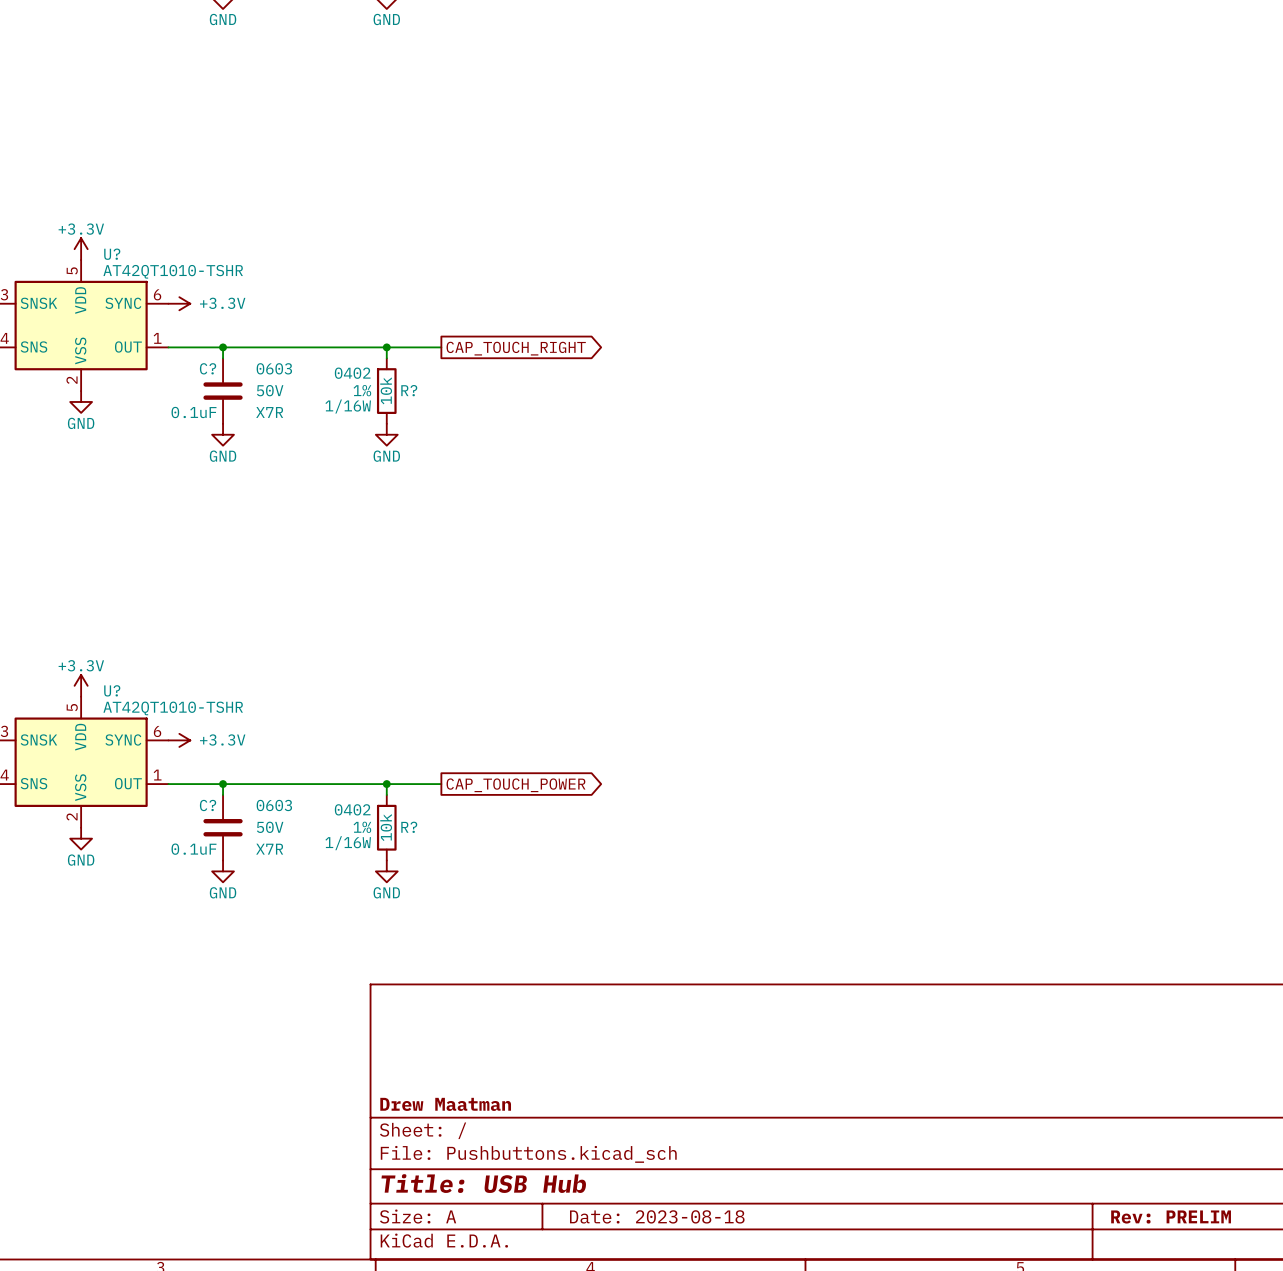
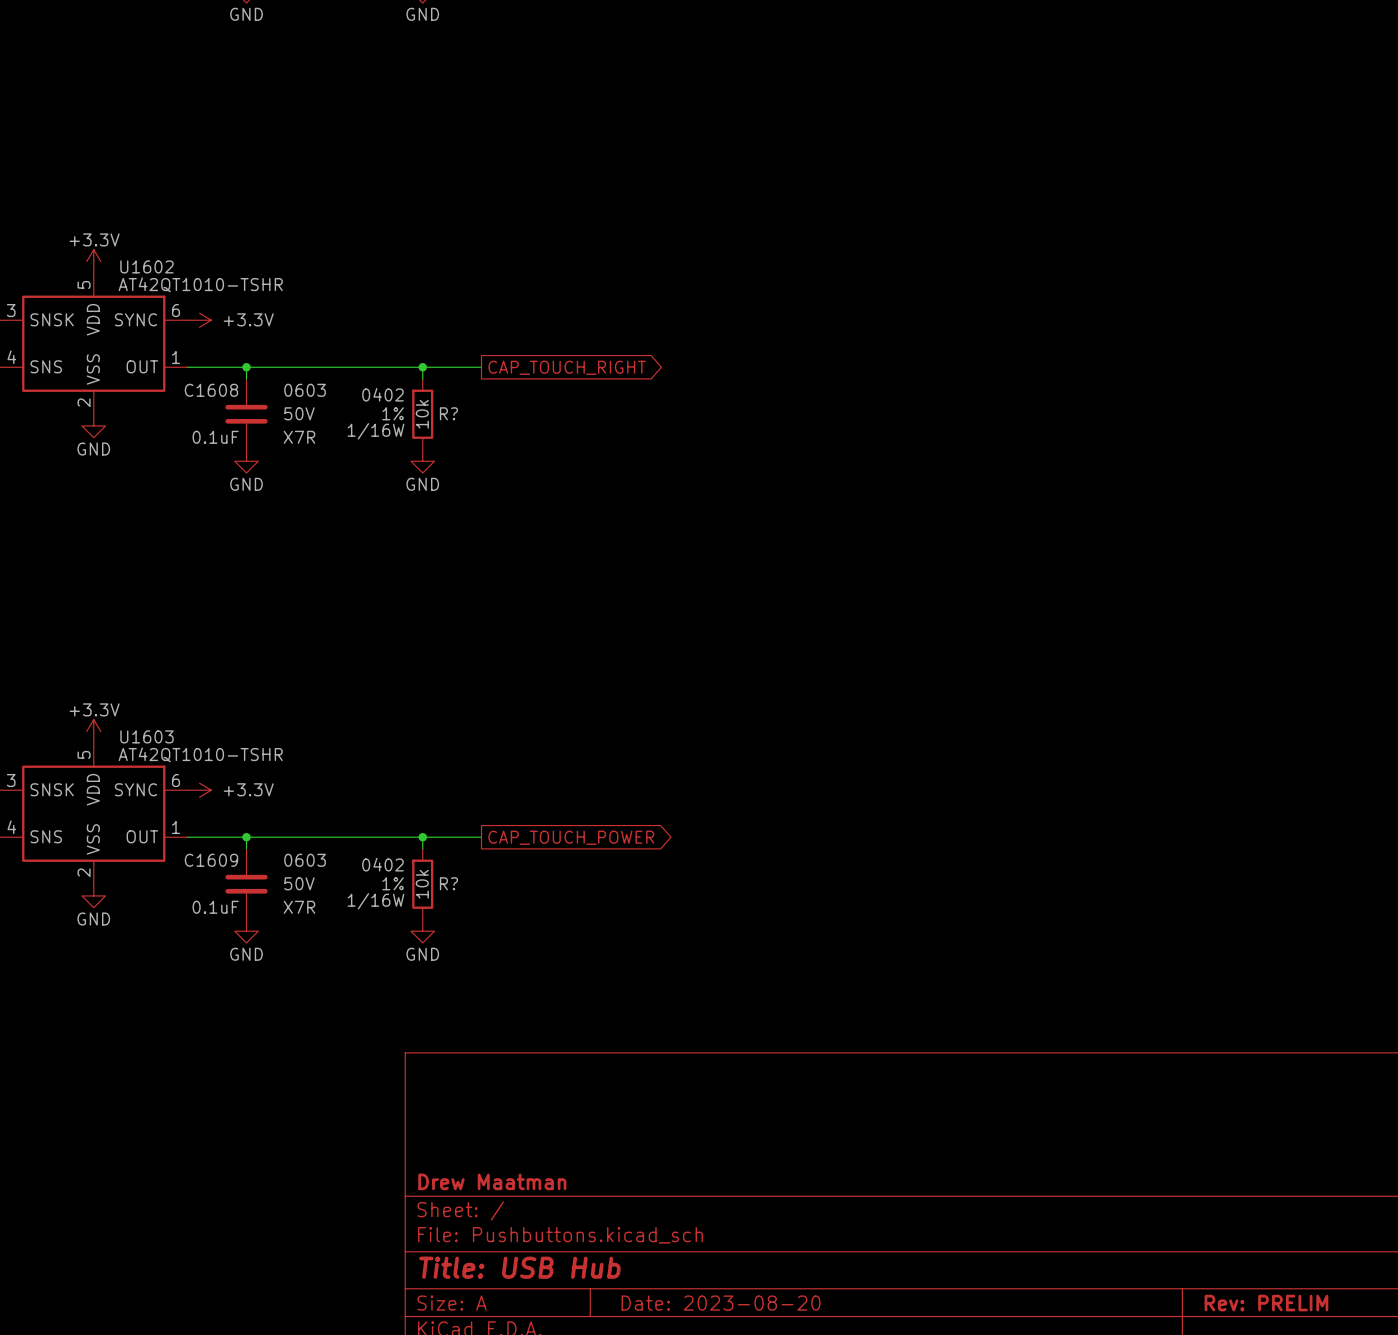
U? name: U? (112, 254) -> U1602 (147, 266)
C? name: C? (208, 368) -> C1608 (211, 390)
U? name: U? (112, 690) -> U1603 (147, 736)
C? name: C? (208, 805) -> C1609 (211, 860)
title block: Date: 2023-08-18 (657, 1216) -> Date: 2023-08-20 (721, 1303)

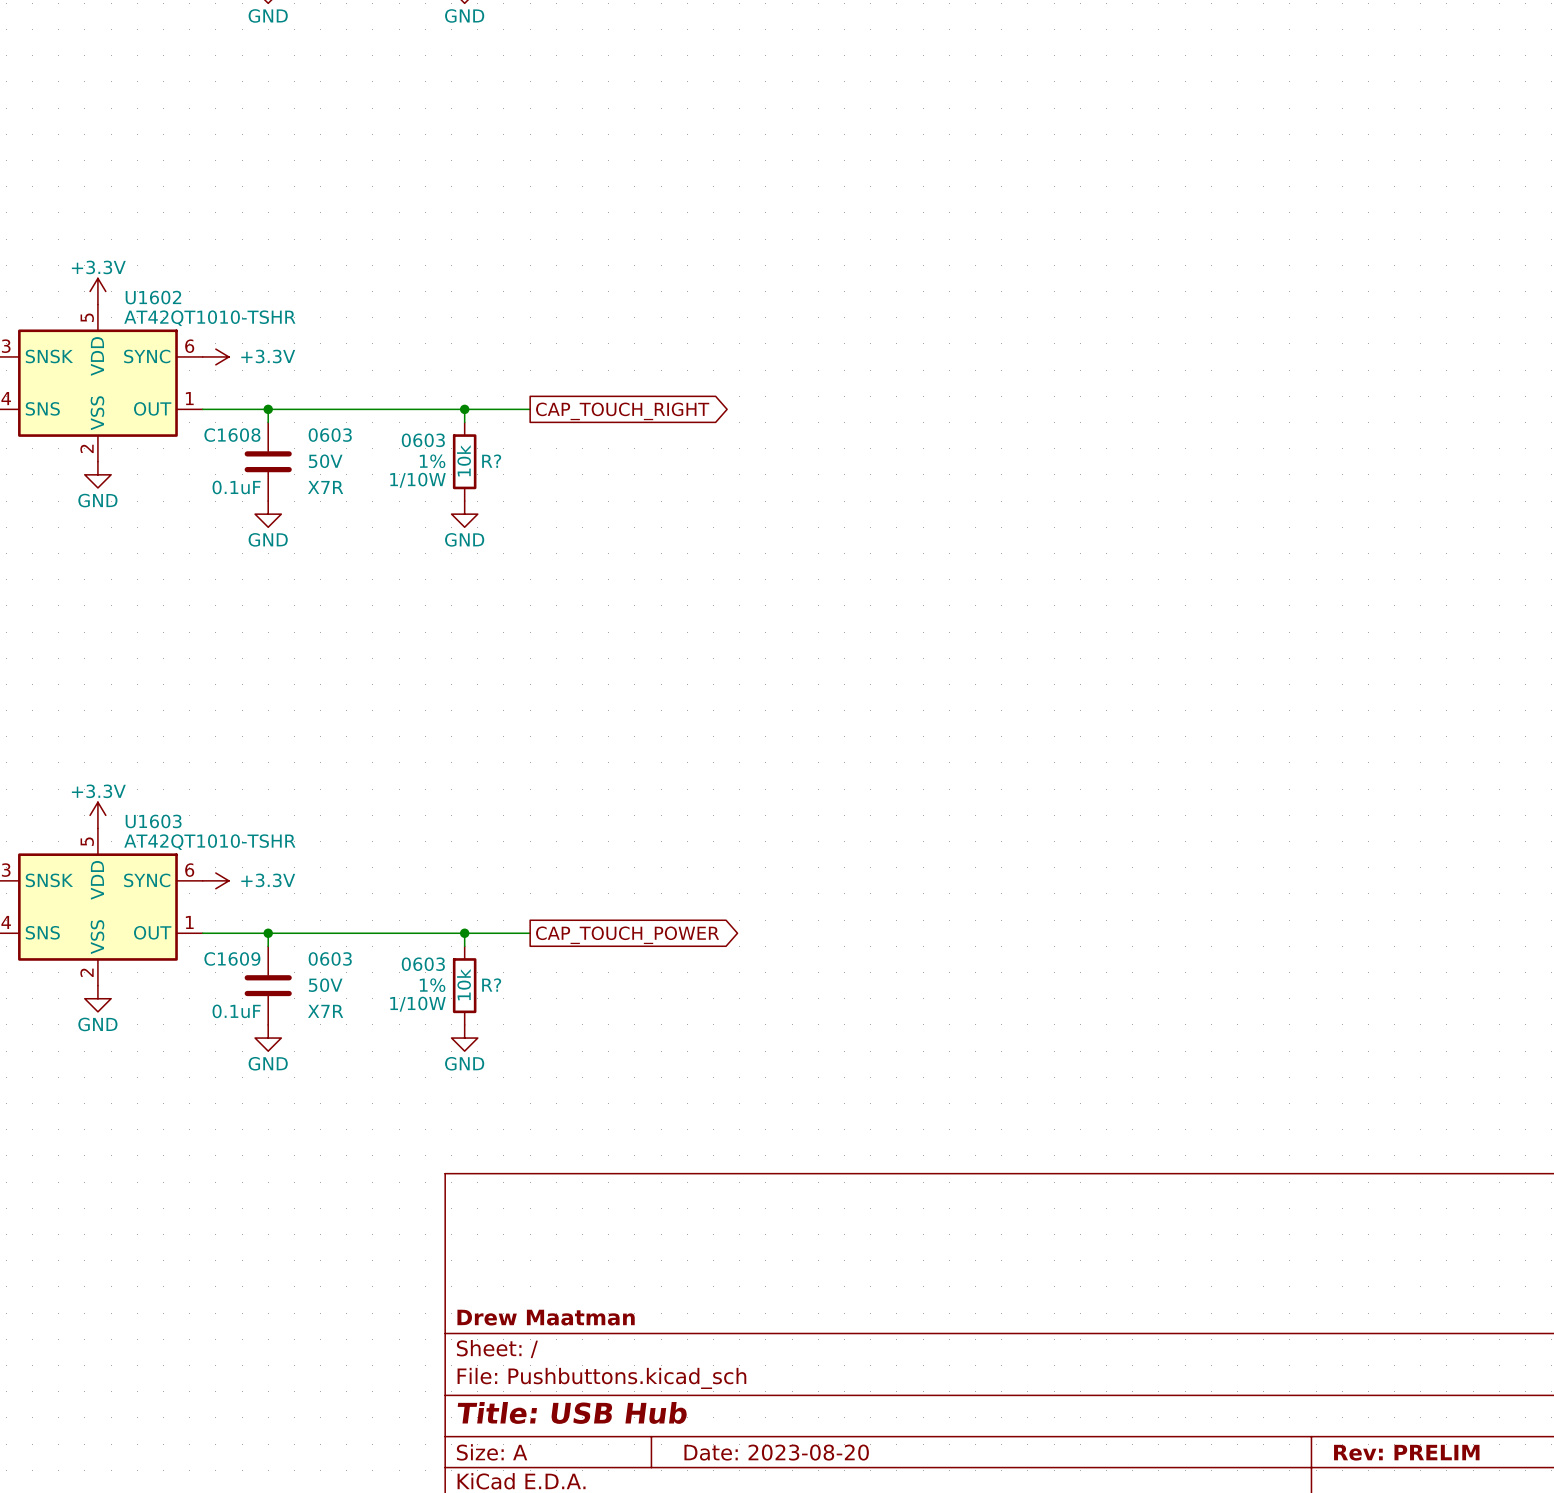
R? text: 0402 (382, 394) -> 0603 (423, 440)
R? text: 1/16W (375, 431) -> 1/10W (417, 480)
R? text: 0402 (382, 864) -> 0603 (423, 964)
R? text: 1/16W (375, 901) -> 1/10W (417, 1004)

